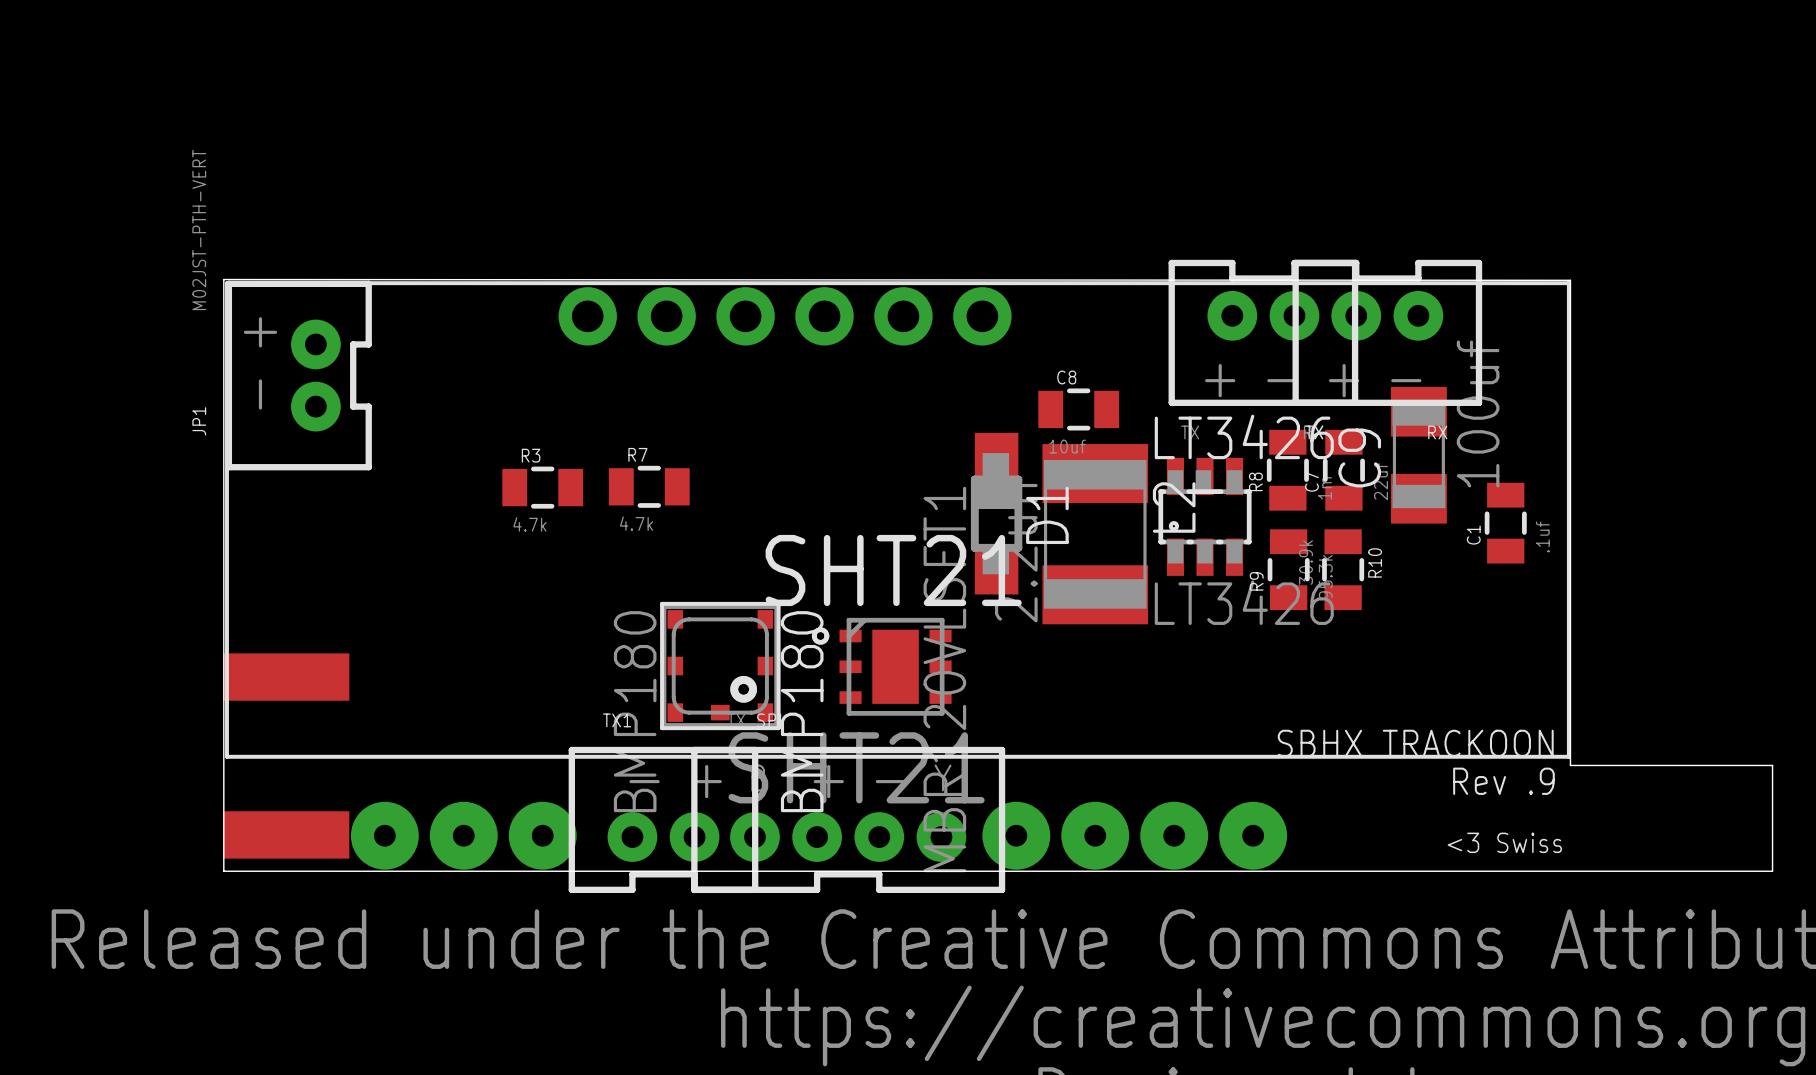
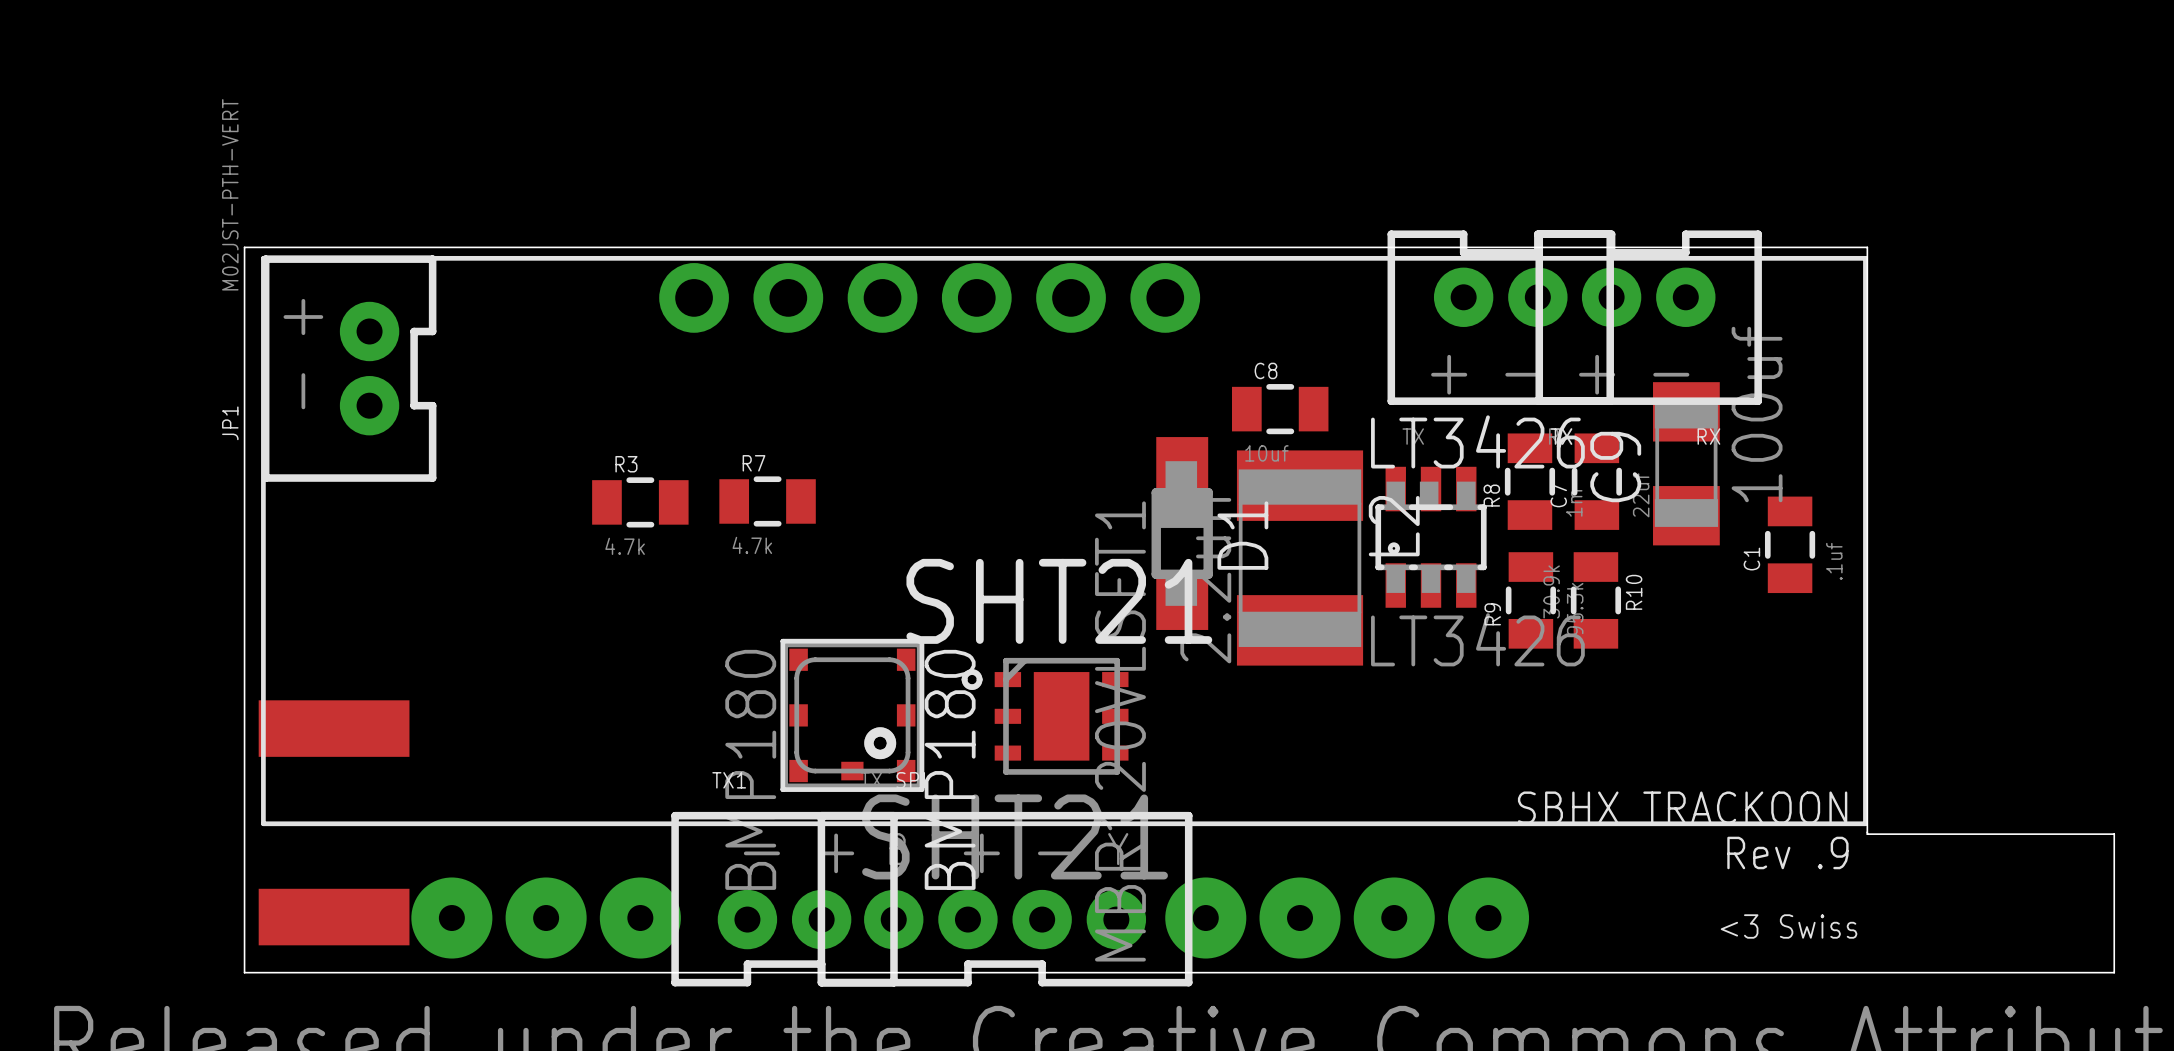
board edge: (1570, 280) (223, 279) (223, 871) (1772, 871) (1772, 765) -> (1867, 254) (1867, 247) (244, 247) (244, 972) (2114, 972) (2114, 834) (2108, 834)

